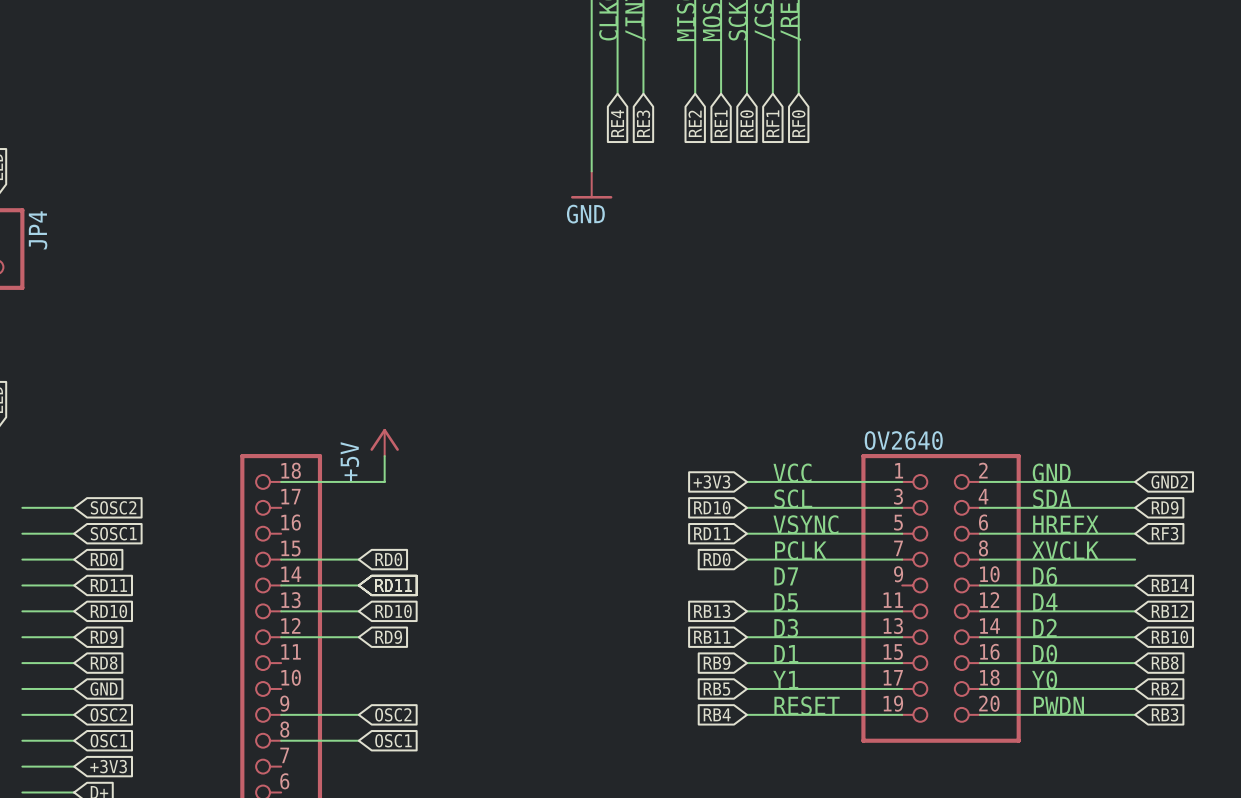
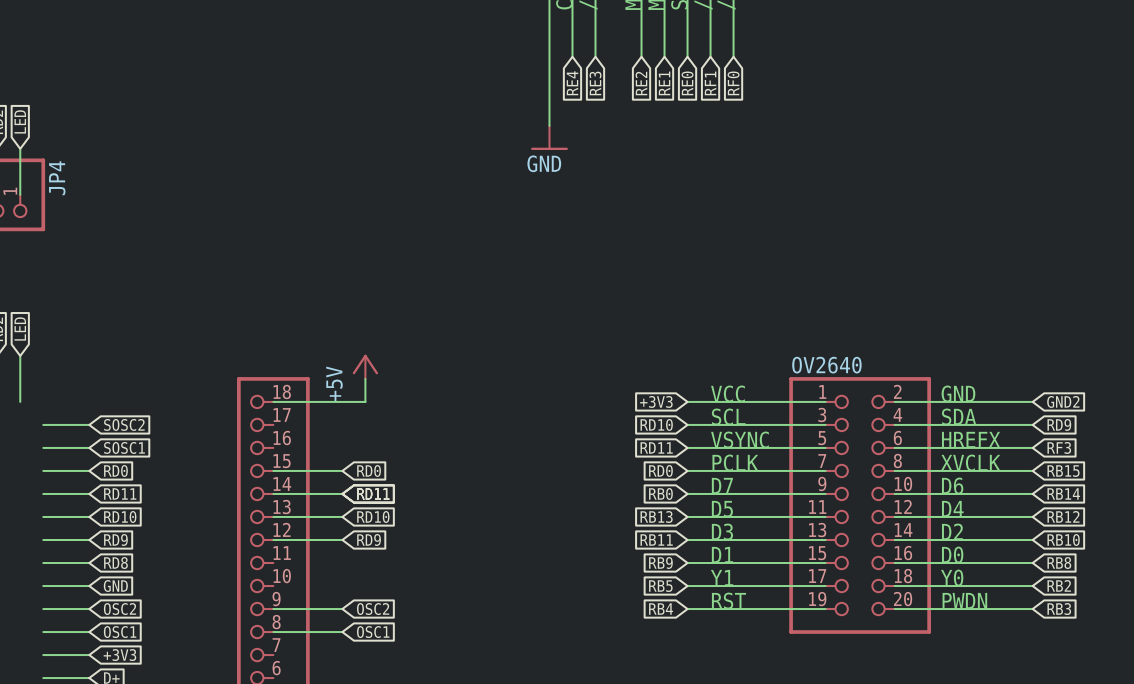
global label: none -> RB15 (1063, 471)
global label: none -> RB0 (660, 493)
wire: none -> (687, 493) (825, 493)
text: RESET (807, 705) -> RST (728, 600)

